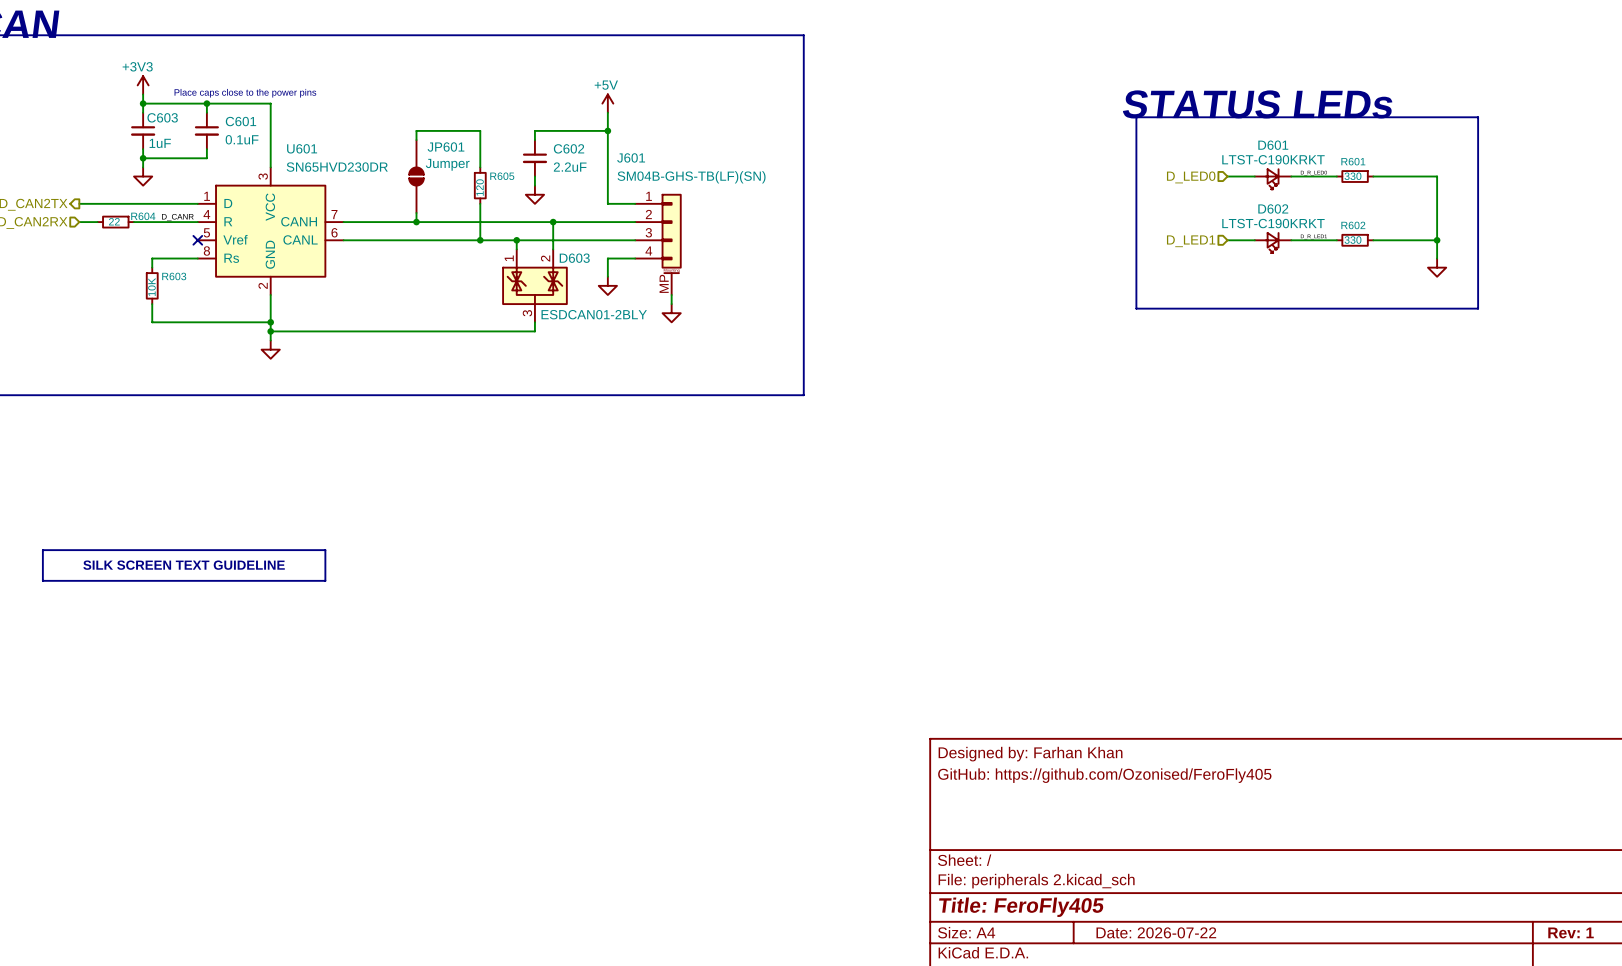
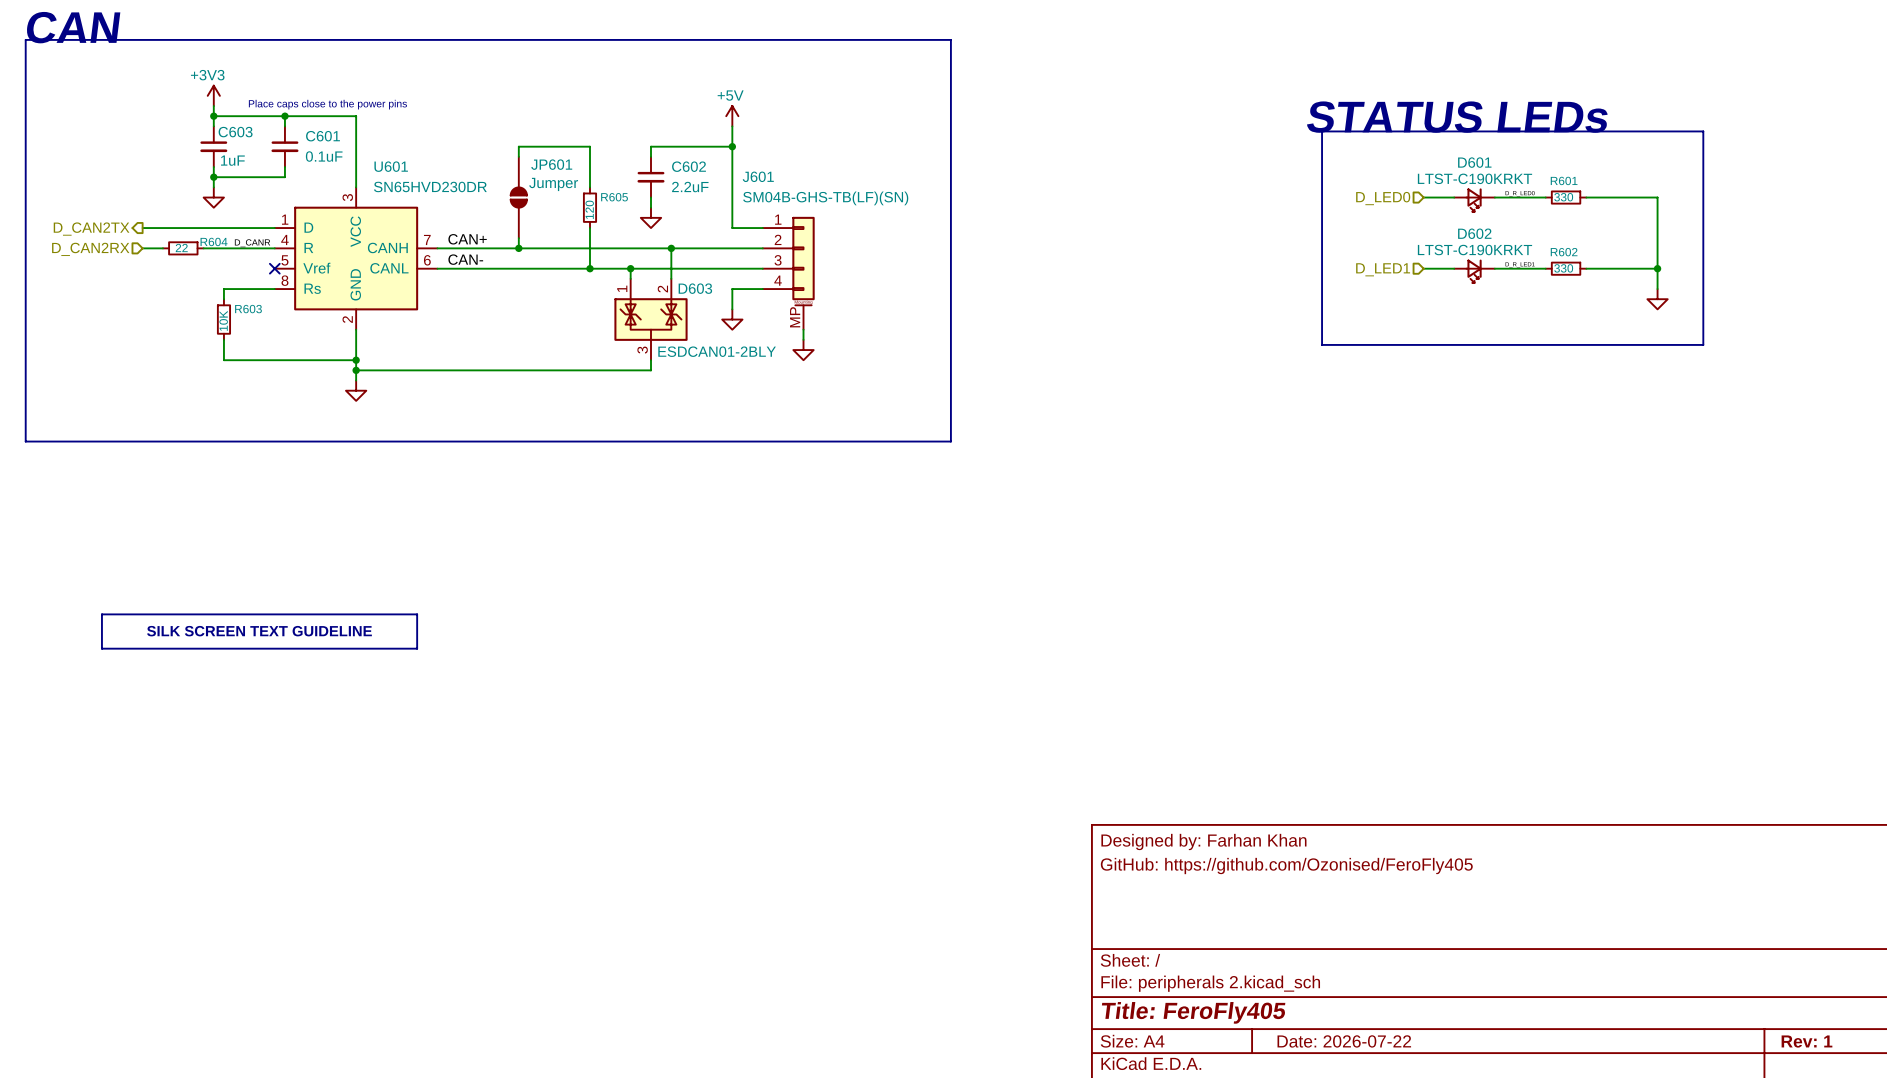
label: none -> CAN+ (467, 239)
label: none -> CAN- (465, 259)

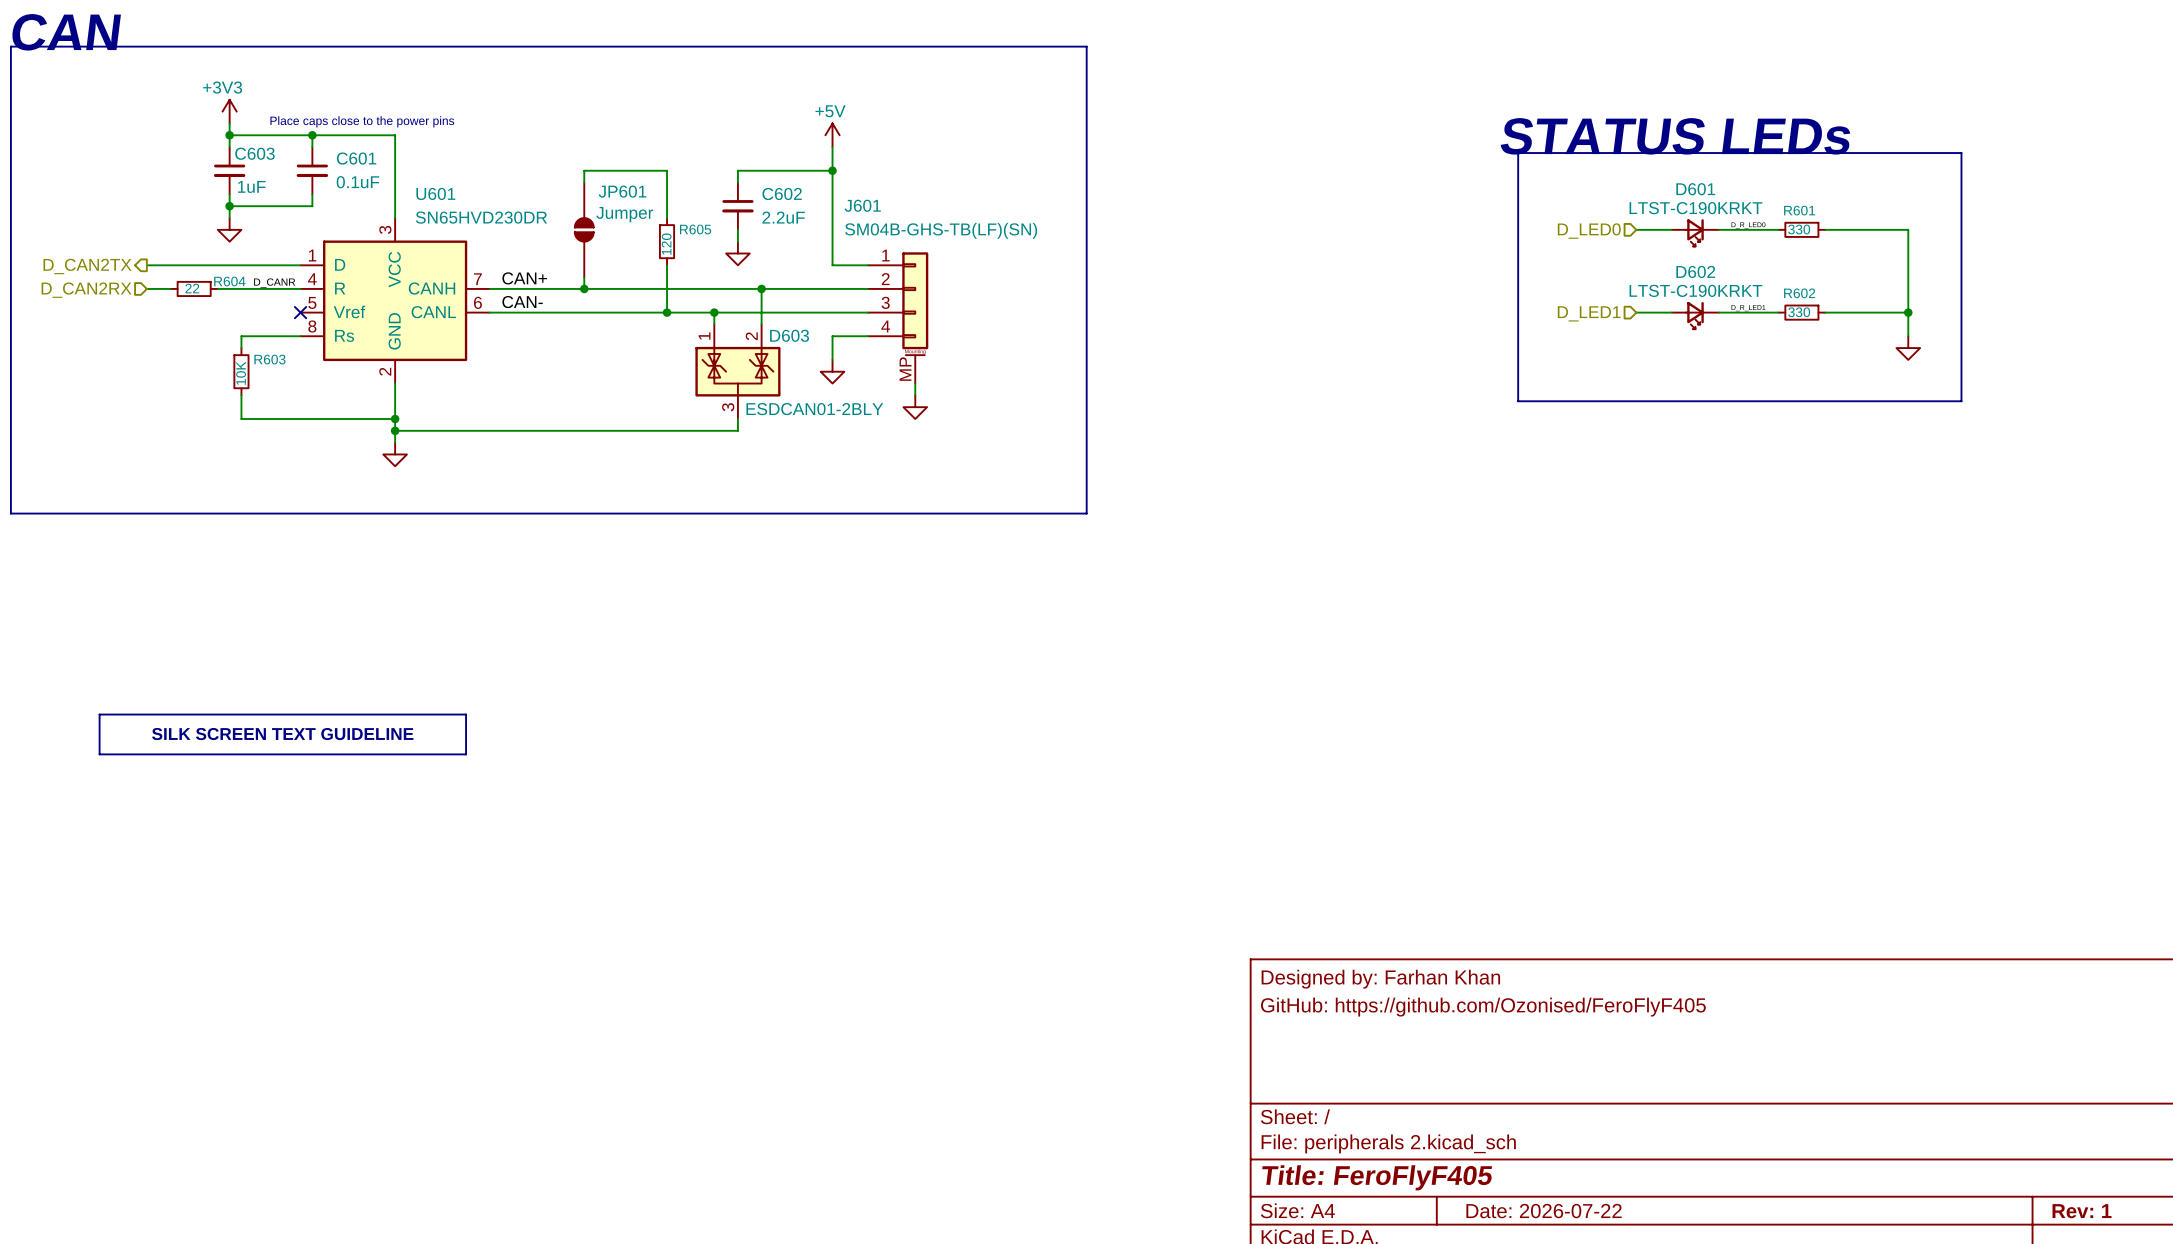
title block: GitHub: https://github.com/Ozonised/FeroFly405 (1286, 866) -> GitHub: https://github.com/Ozonised/FeroFlyF405 (1483, 1007)
title block: Title: FeroFly405 (1193, 1012) -> Title: FeroFlyF405 (1377, 1177)

